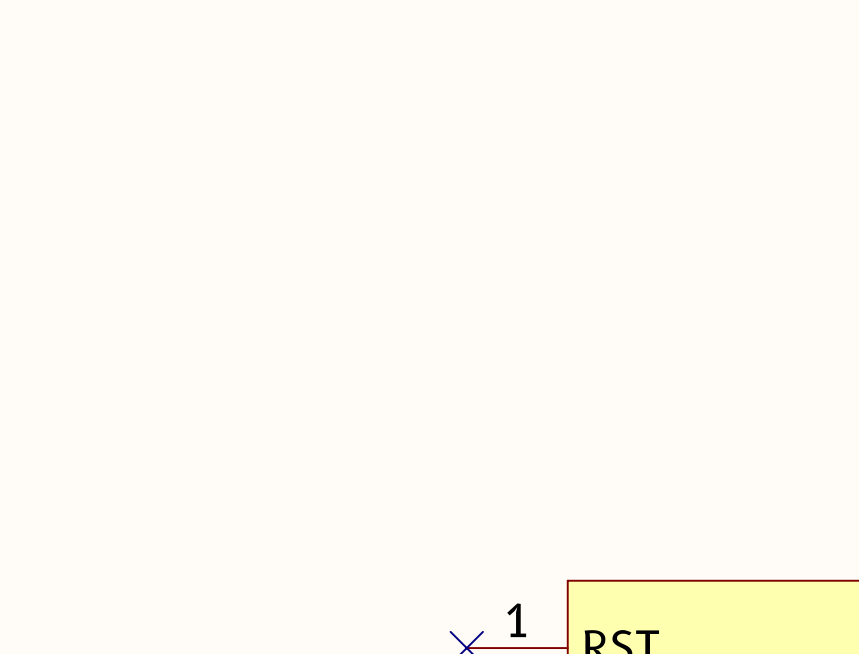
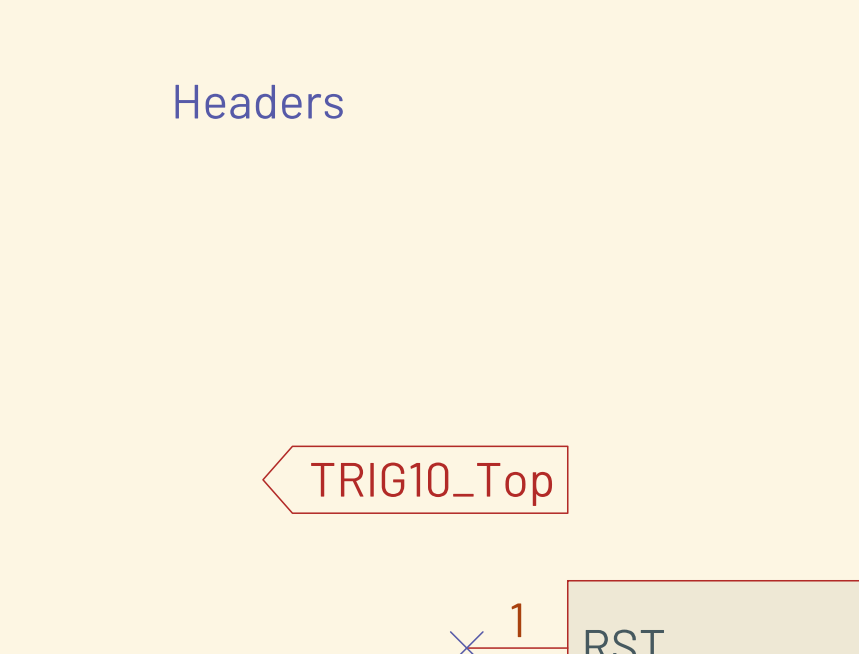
text: none -> Headers (259, 101)
global label: none -> TRIG10_Top (431, 484)

